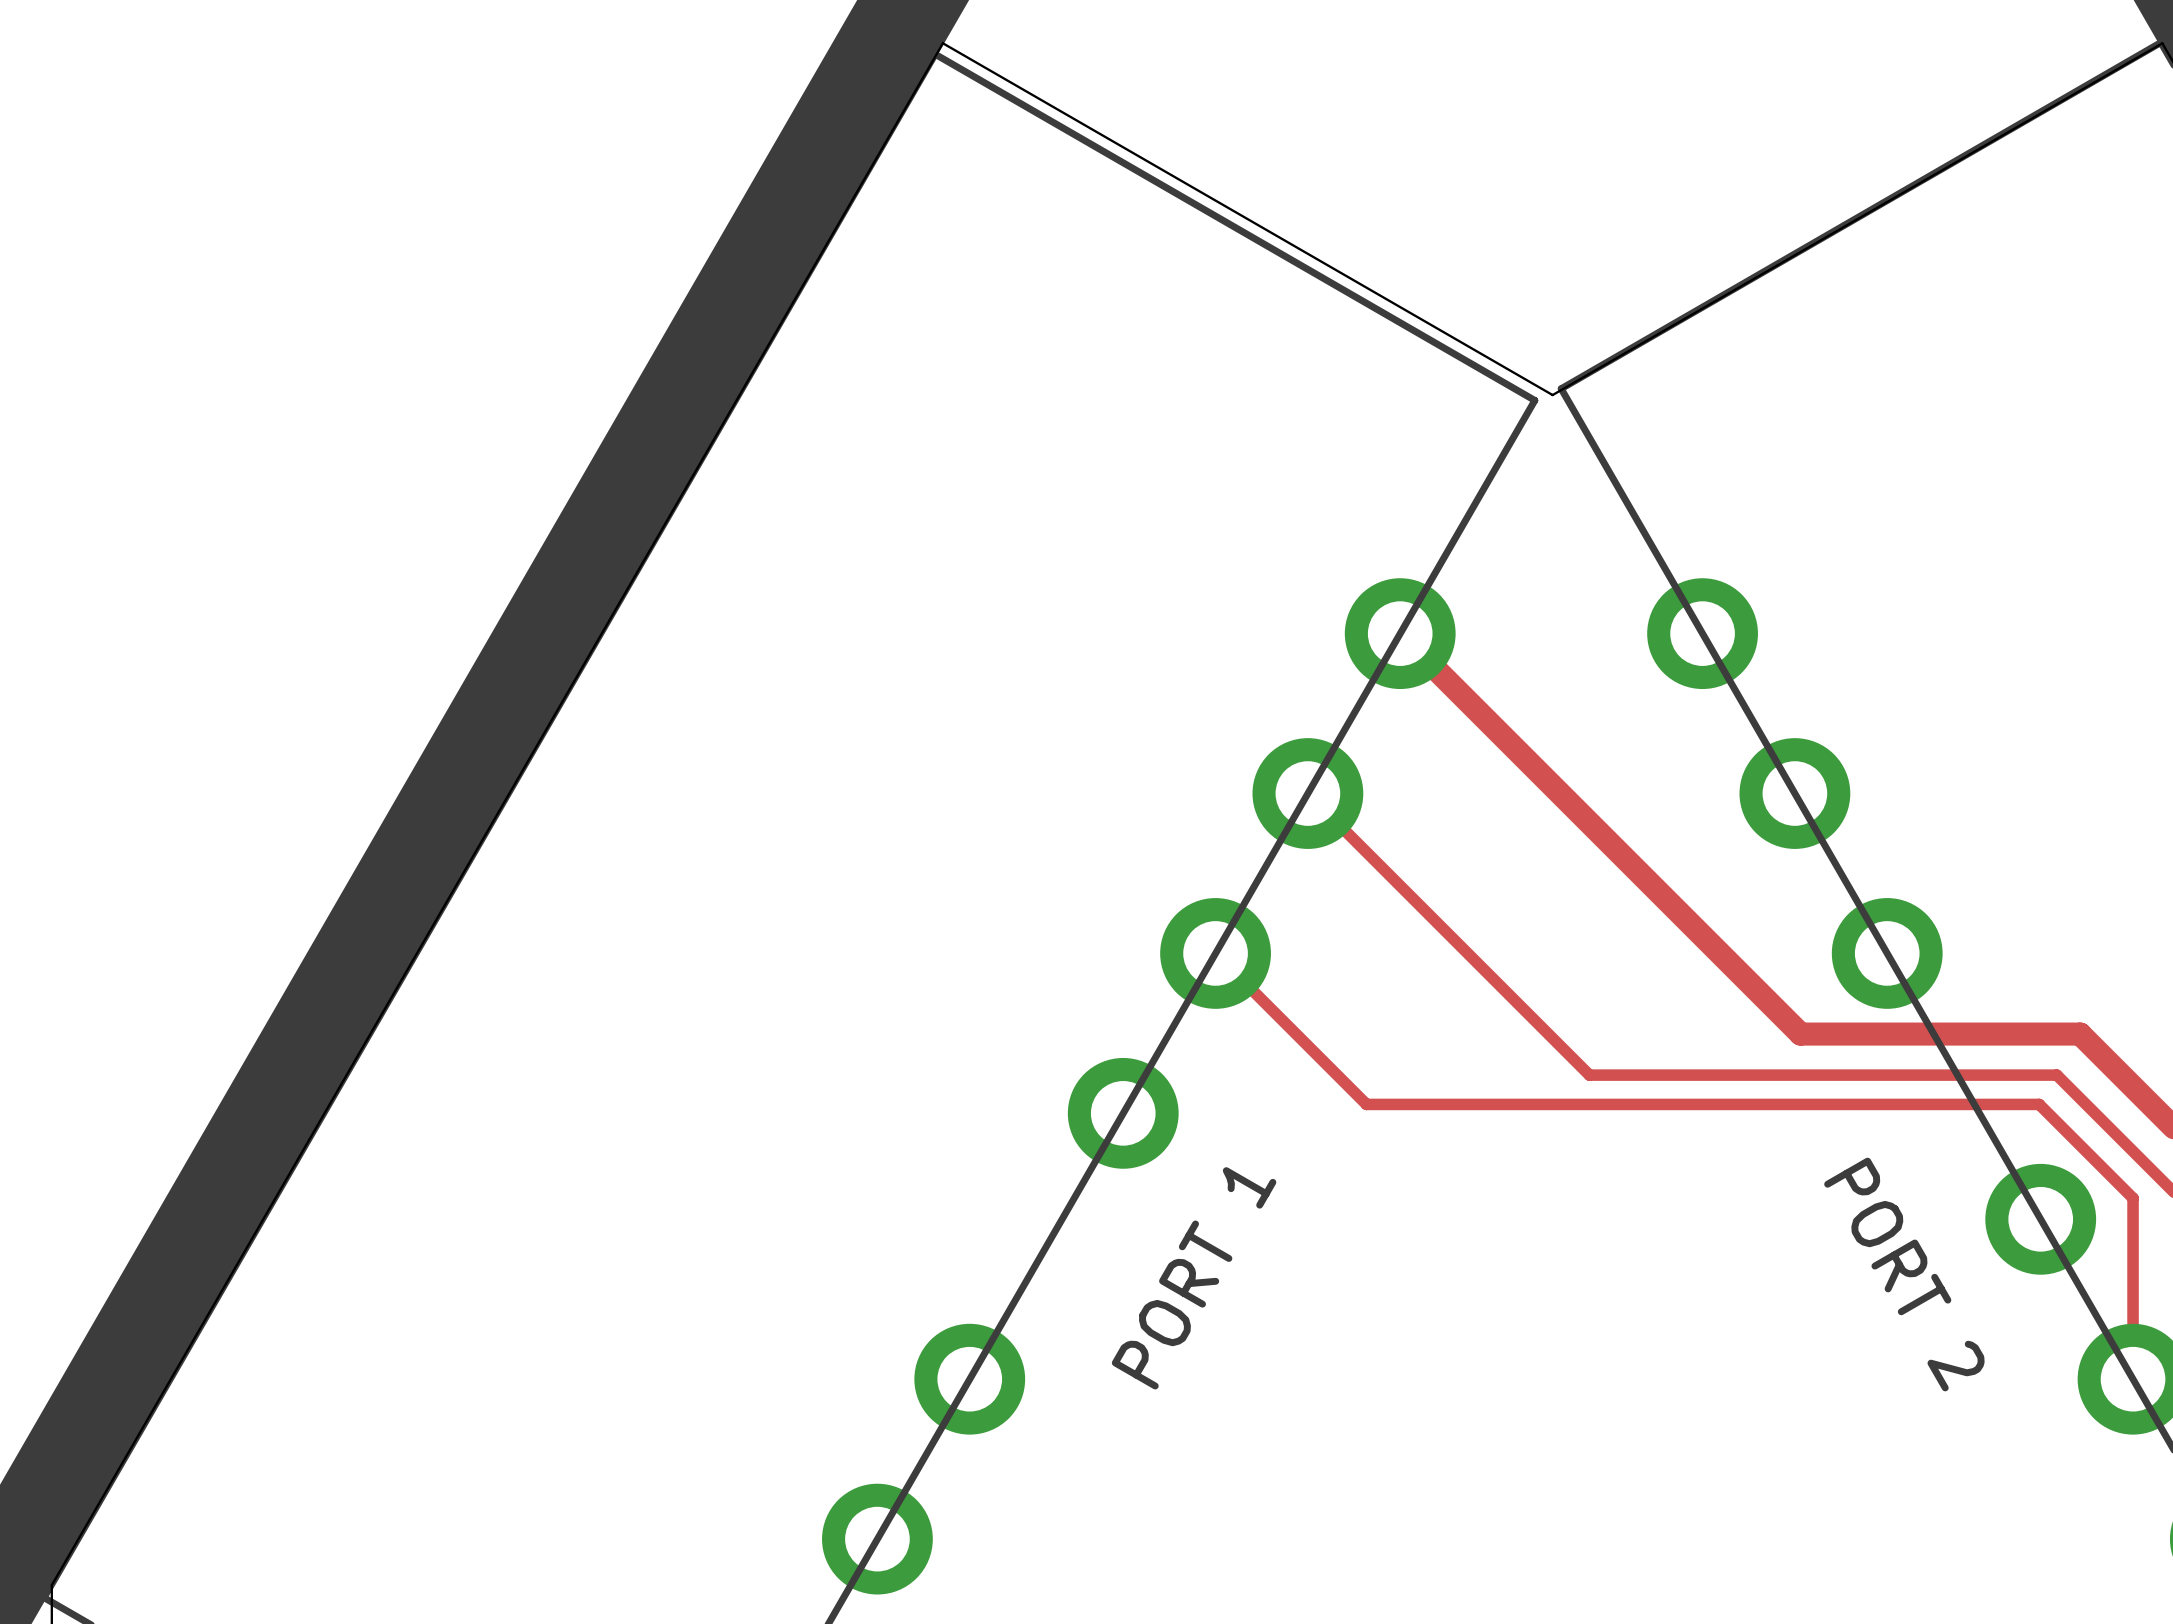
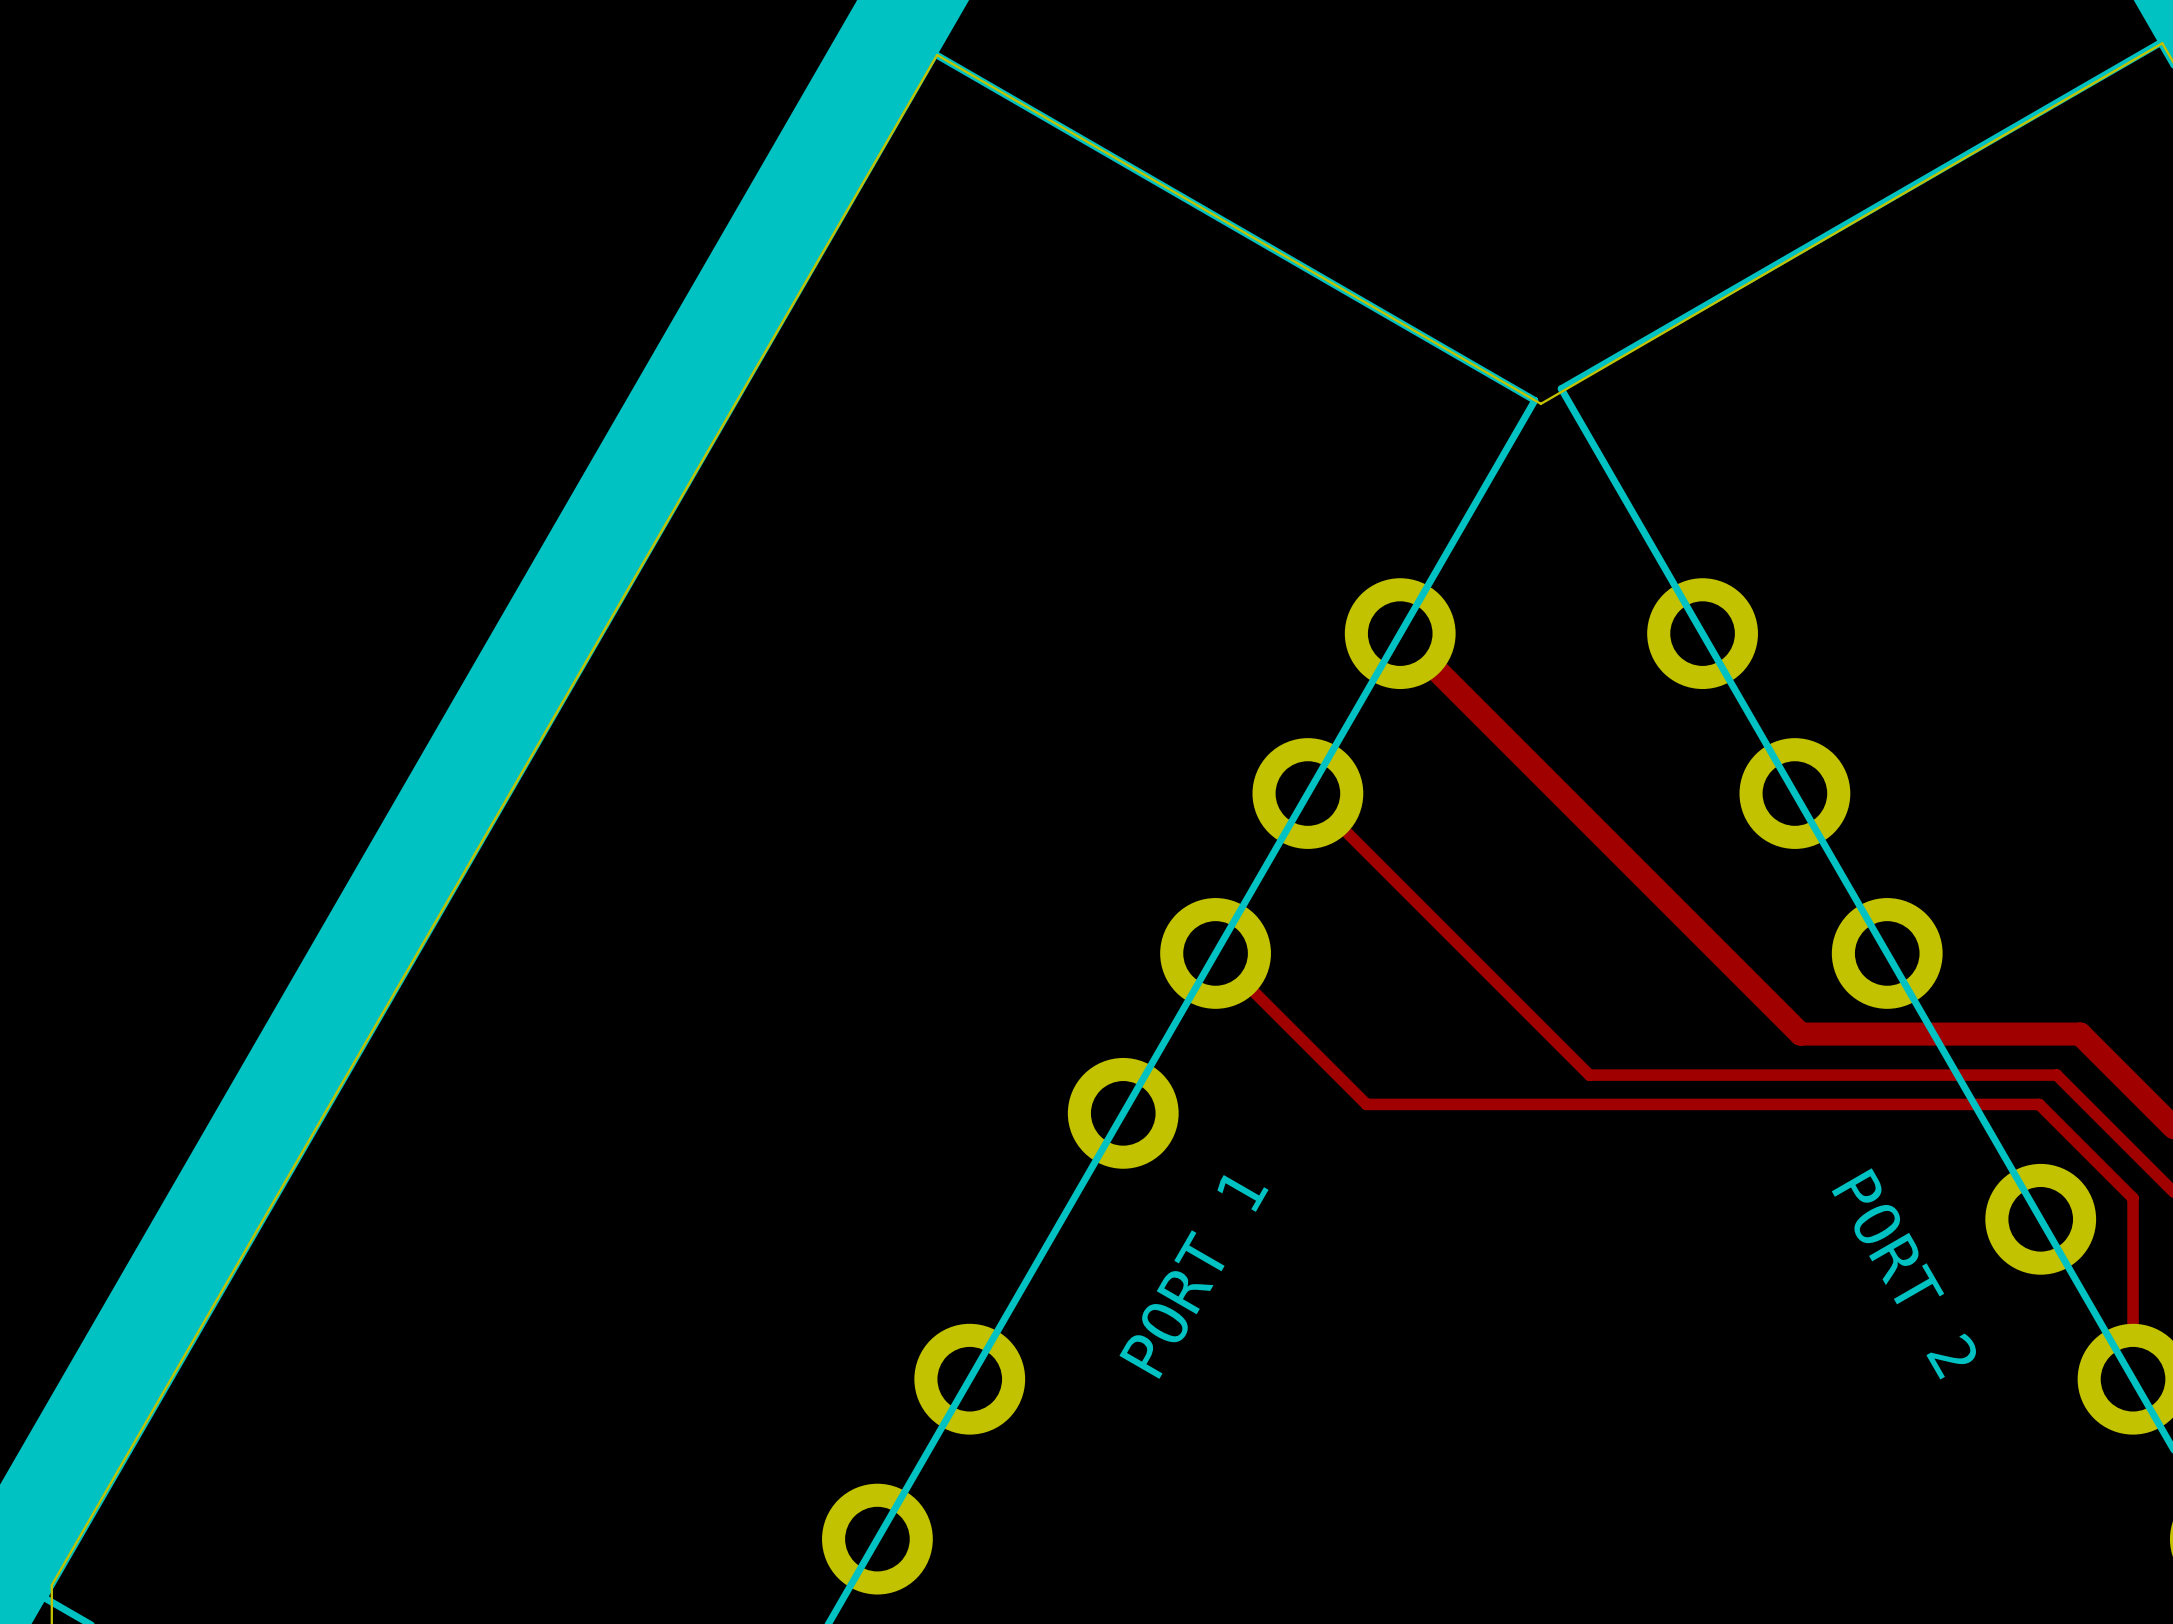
board edge: (2162, 43) (1552, 395) (942, 43) (51, 1585) -> (2162, 43) (1540, 403) (937, 55) (51, 1585)

